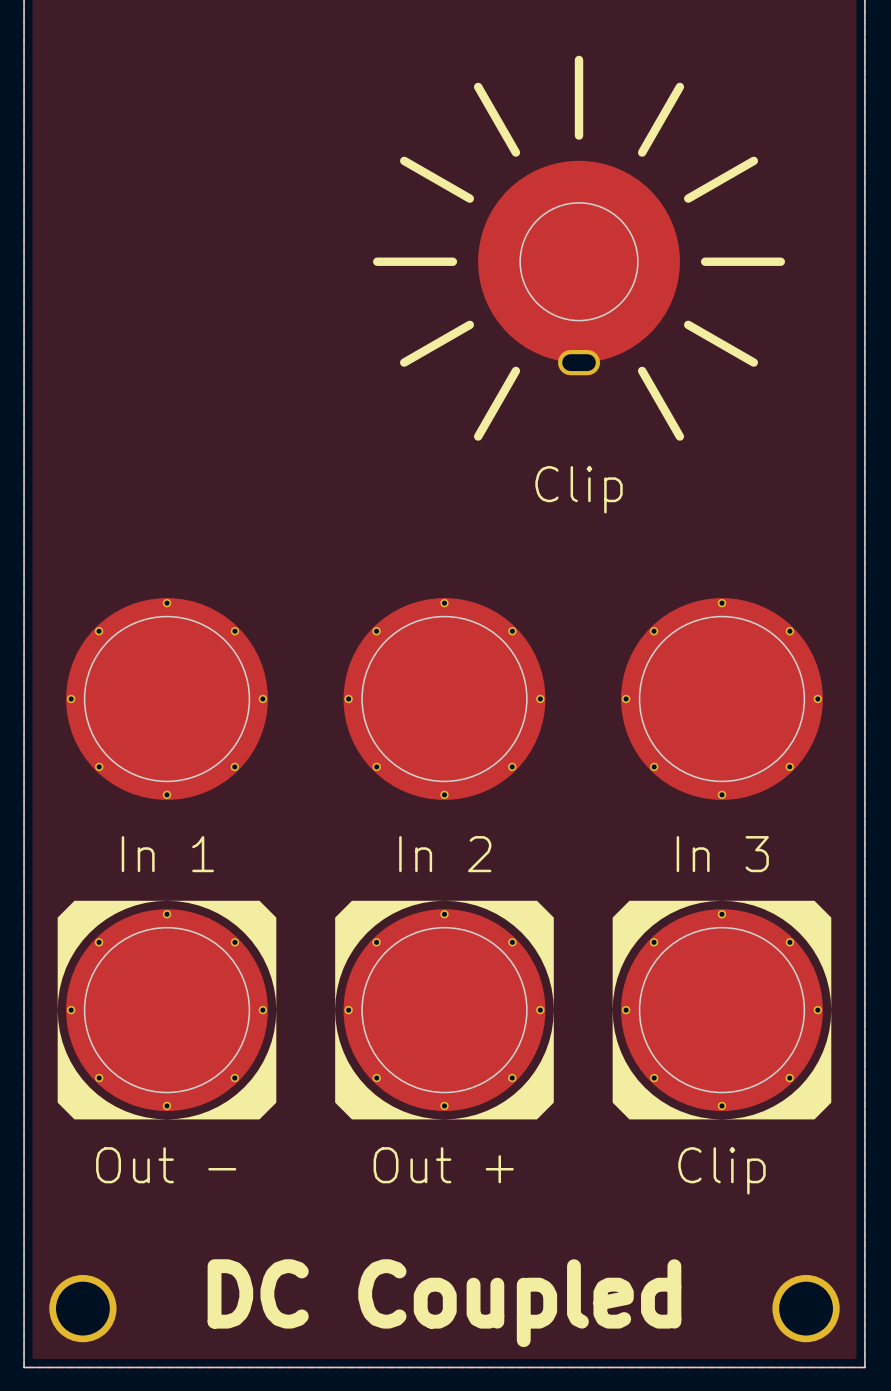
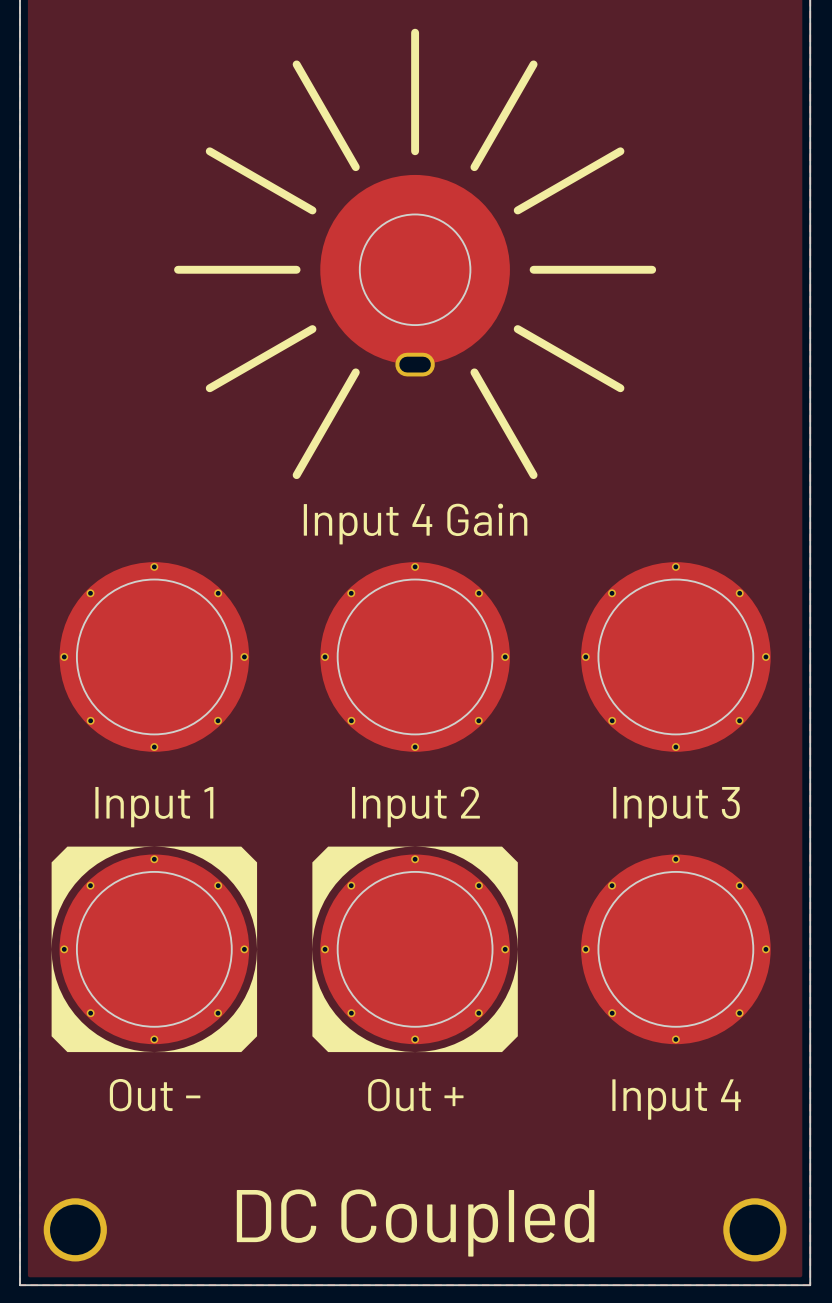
part: Clip (579, 248) -> none
part: none -> Input 4 Gain (415, 253)
part value: In 1 (167, 854) -> Input 1 (154, 807)
part value: In 2 (445, 854) -> Input 2 (415, 806)
part value: In 3 (722, 854) -> Input 3 (676, 807)
part footprint: [612, 900, 832, 1120] -> [581, 854, 771, 1045]
part value: Clip (721, 1170) -> Input 4 (676, 1099)

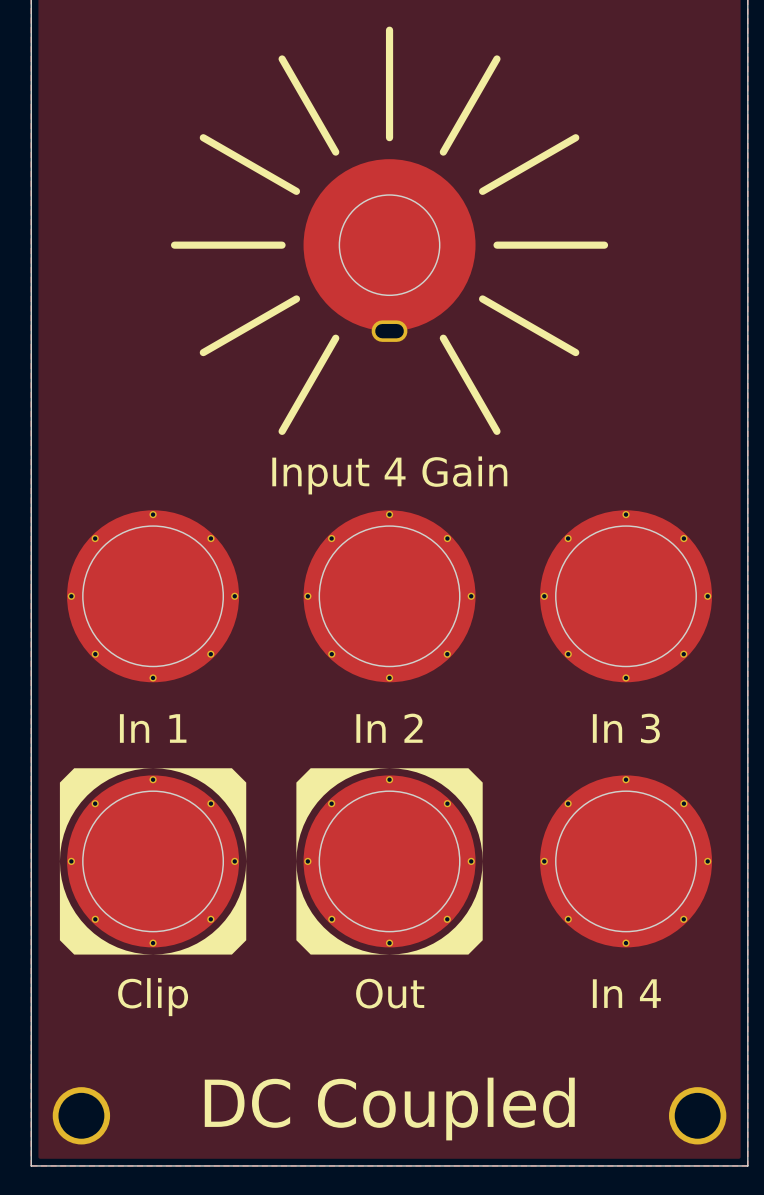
part value: Input 2 (415, 806) -> In 2 (389, 728)
part value: Input 1 (154, 807) -> In 1 (153, 728)
part value: Input 3 (676, 807) -> In 3 (626, 728)
part value: Out - (155, 1095) -> Clip (153, 997)
part value: Out + (415, 1095) -> Out (390, 993)
part value: Input 4 (676, 1099) -> In 4 (626, 993)

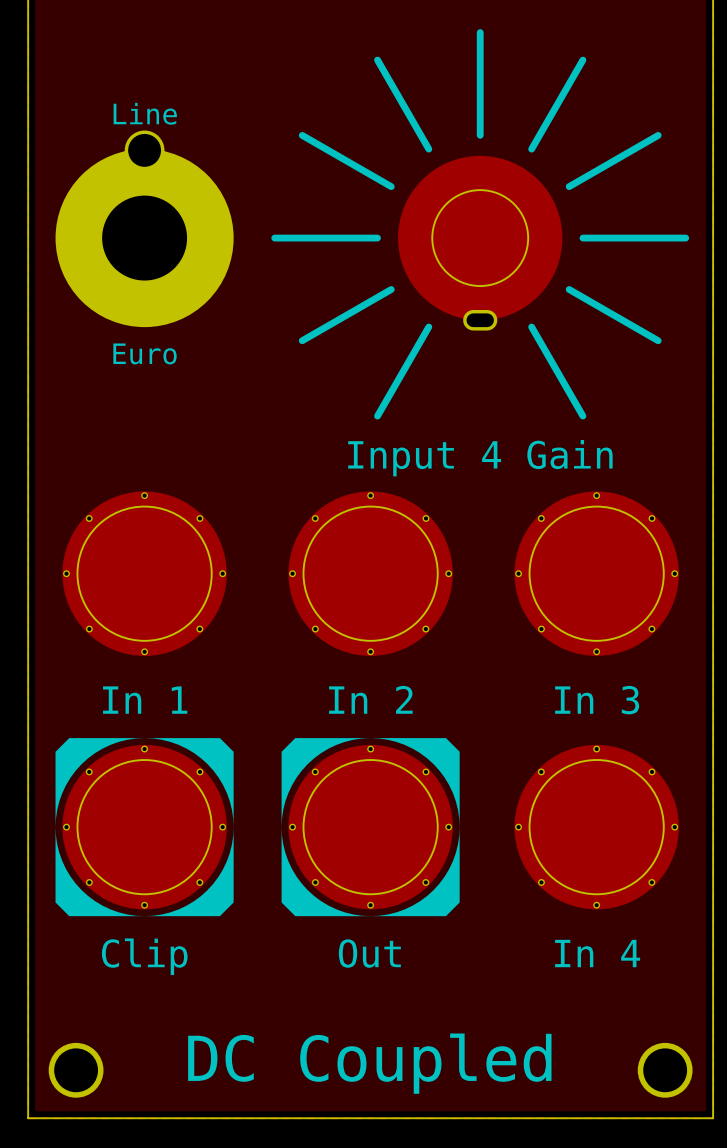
text: none -> Line (145, 113)
part position: (389, 230) -> (480, 224)
part: none -> (144, 228)
text: none -> Euro (145, 353)

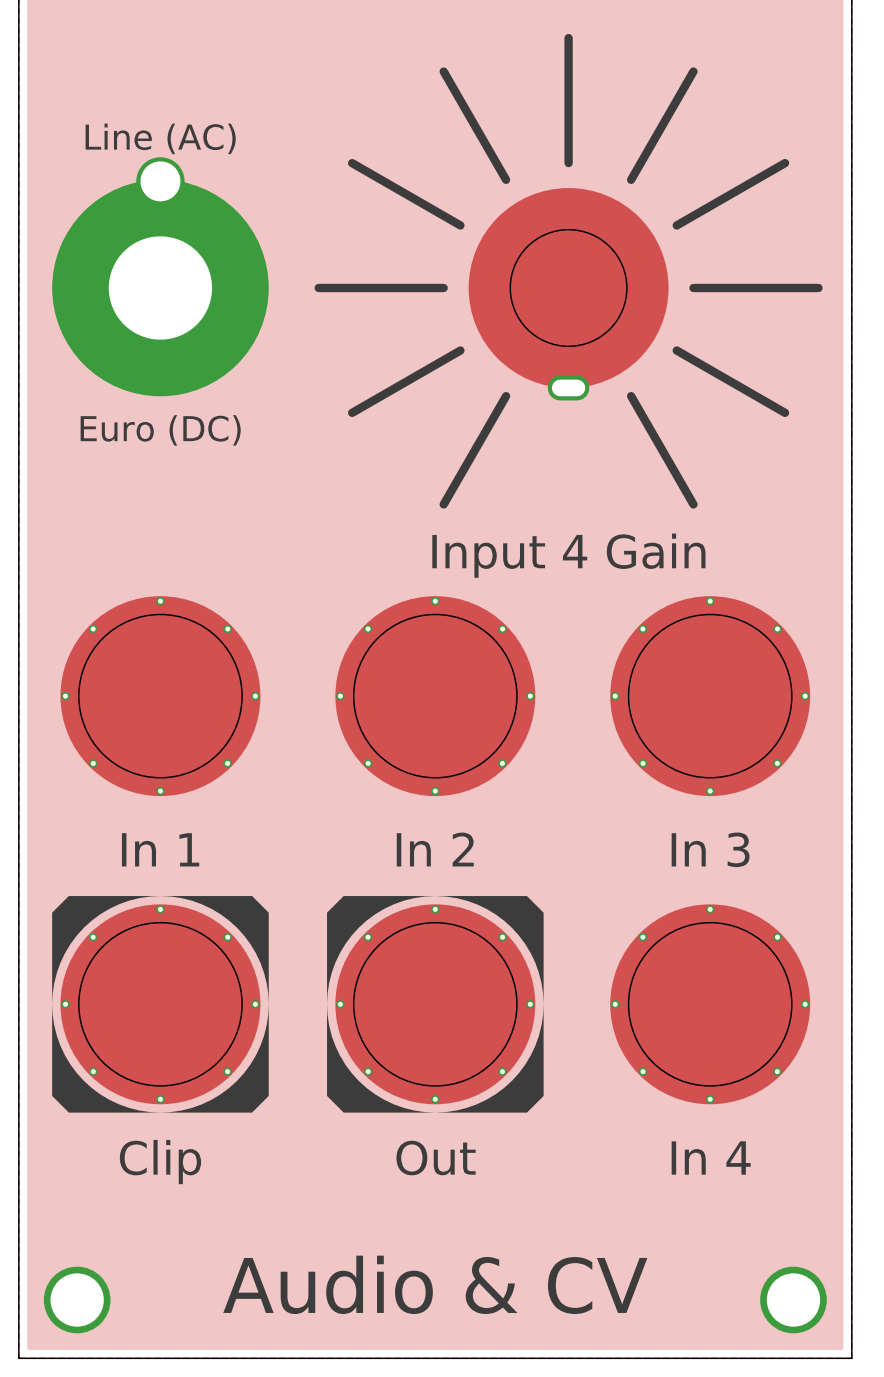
text: Line (145, 113) -> Line (AC) (160, 138)
text: Euro (145, 353) -> Euro (DC) (160, 430)
text: DC Coupled (369, 1063) -> Audio & CV (435, 1284)

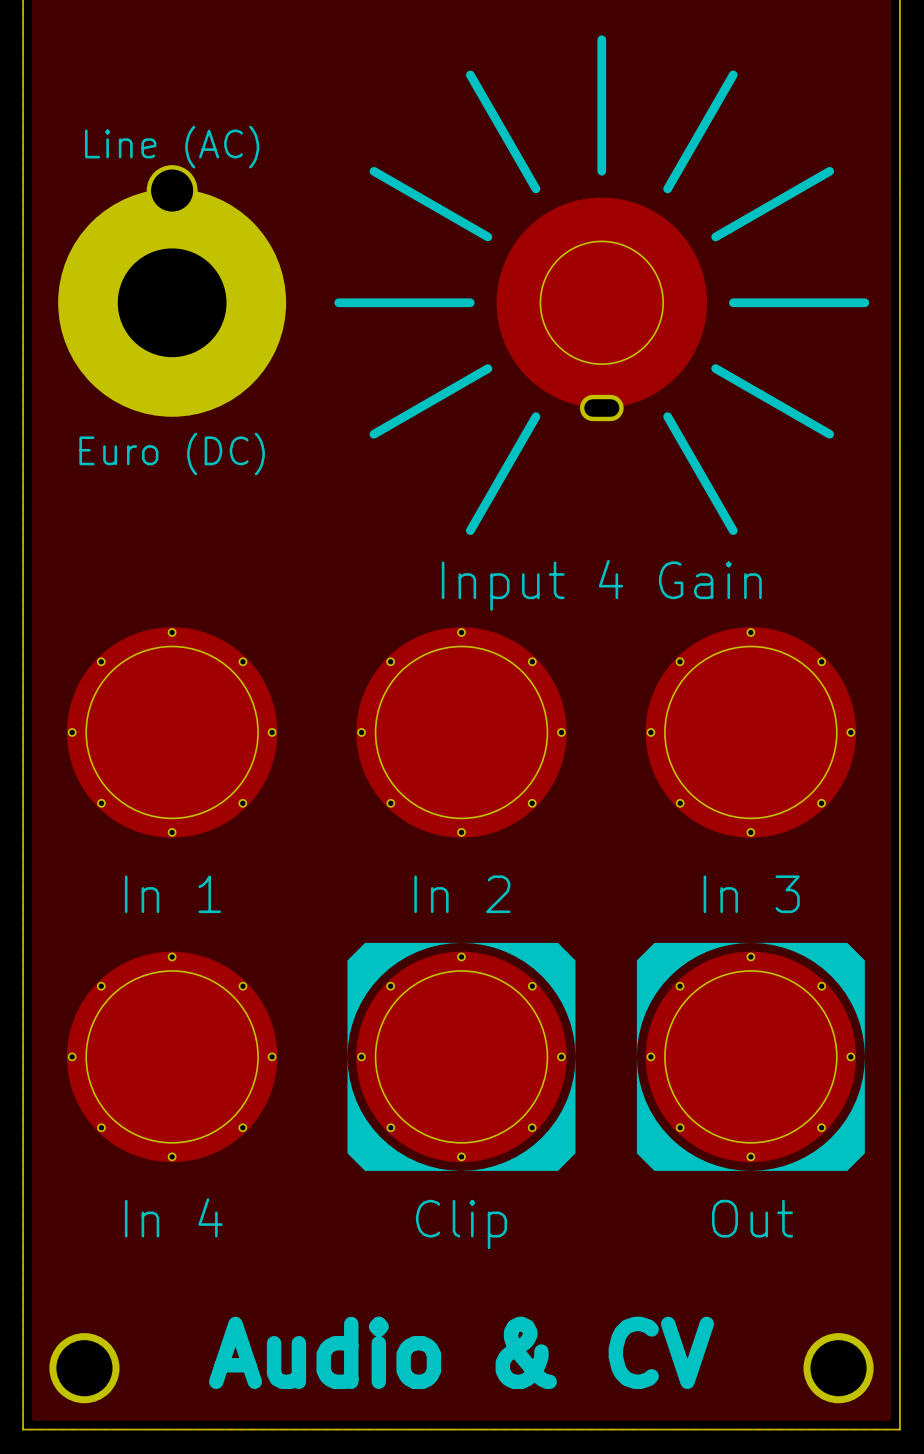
part footprint: [52, 896, 269, 1113] -> [66, 951, 278, 1163]
part footprint: [610, 904, 811, 1105] -> [636, 942, 865, 1171]
part value: Out (436, 1158) -> Clip (461, 1224)
part value: In 4 (711, 1158) -> Out (752, 1218)
part value: Clip (160, 1162) -> In 4 (173, 1217)

